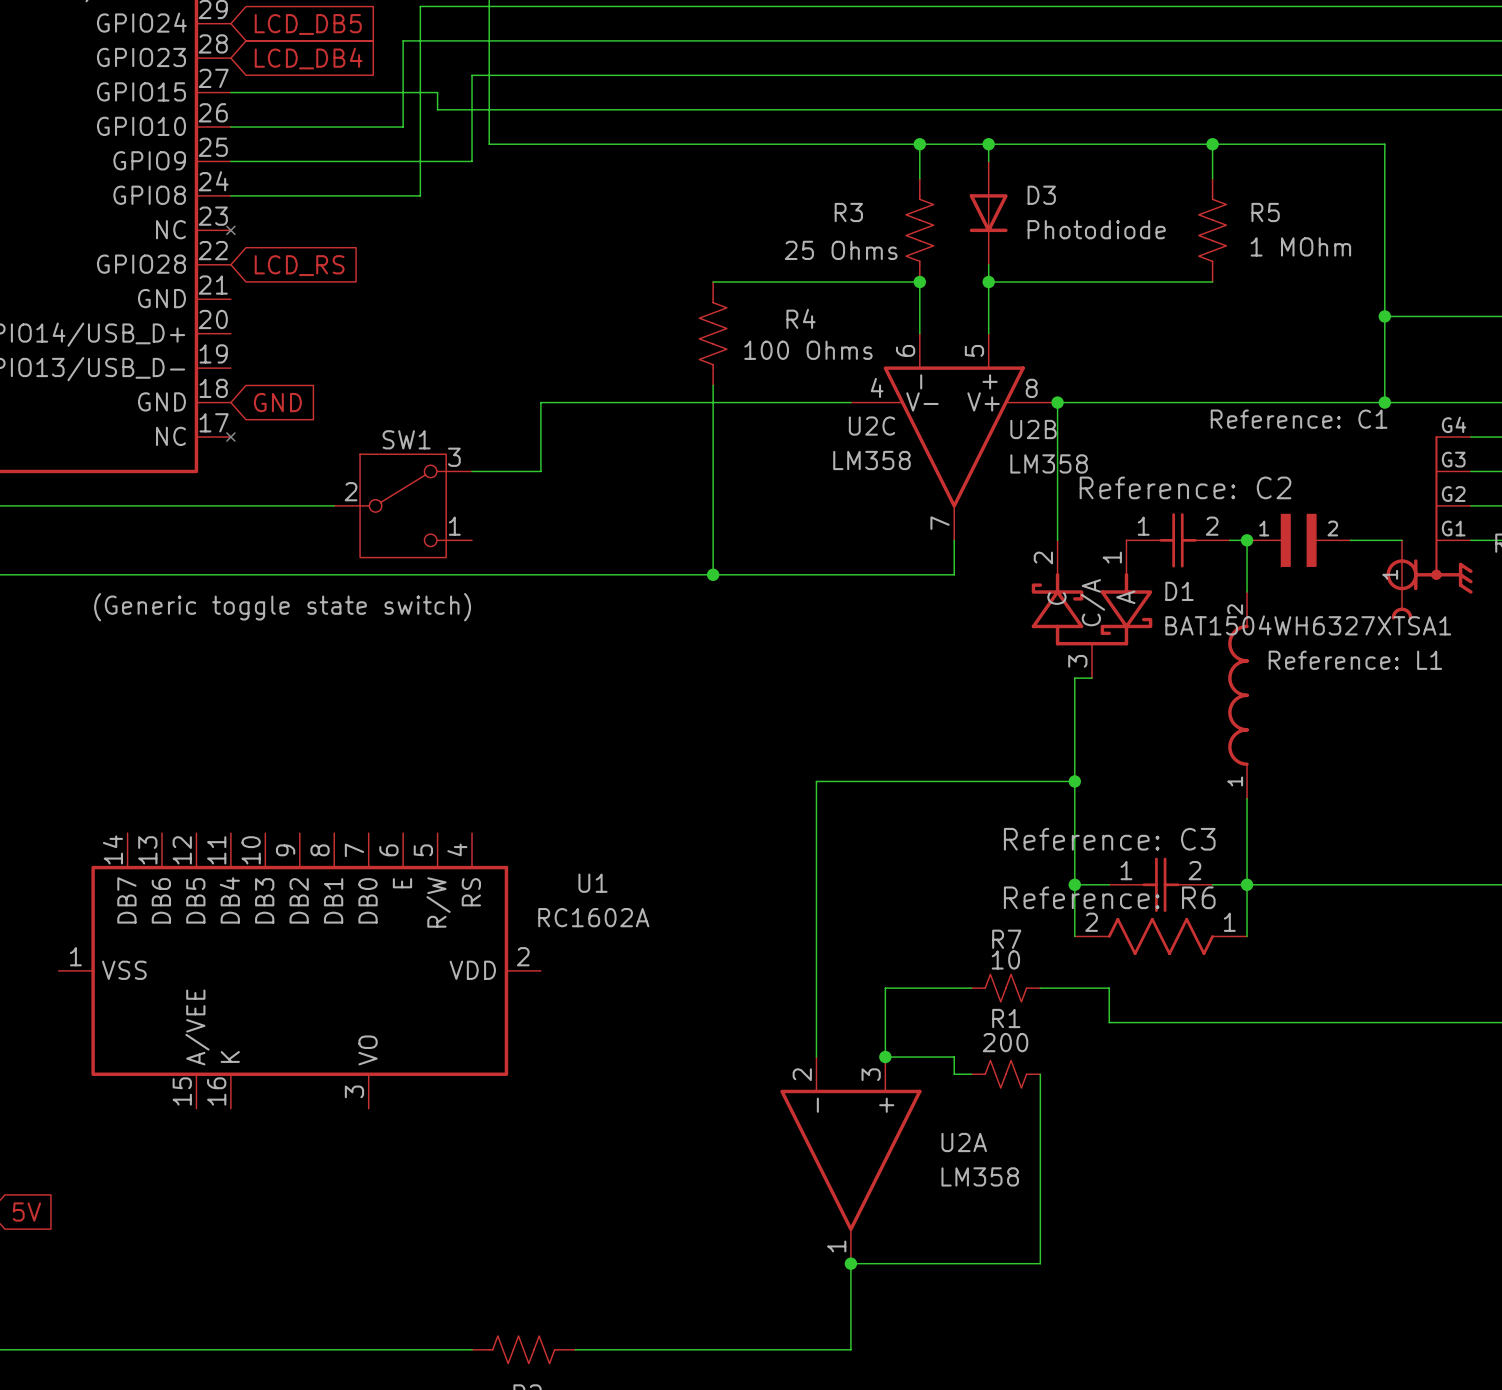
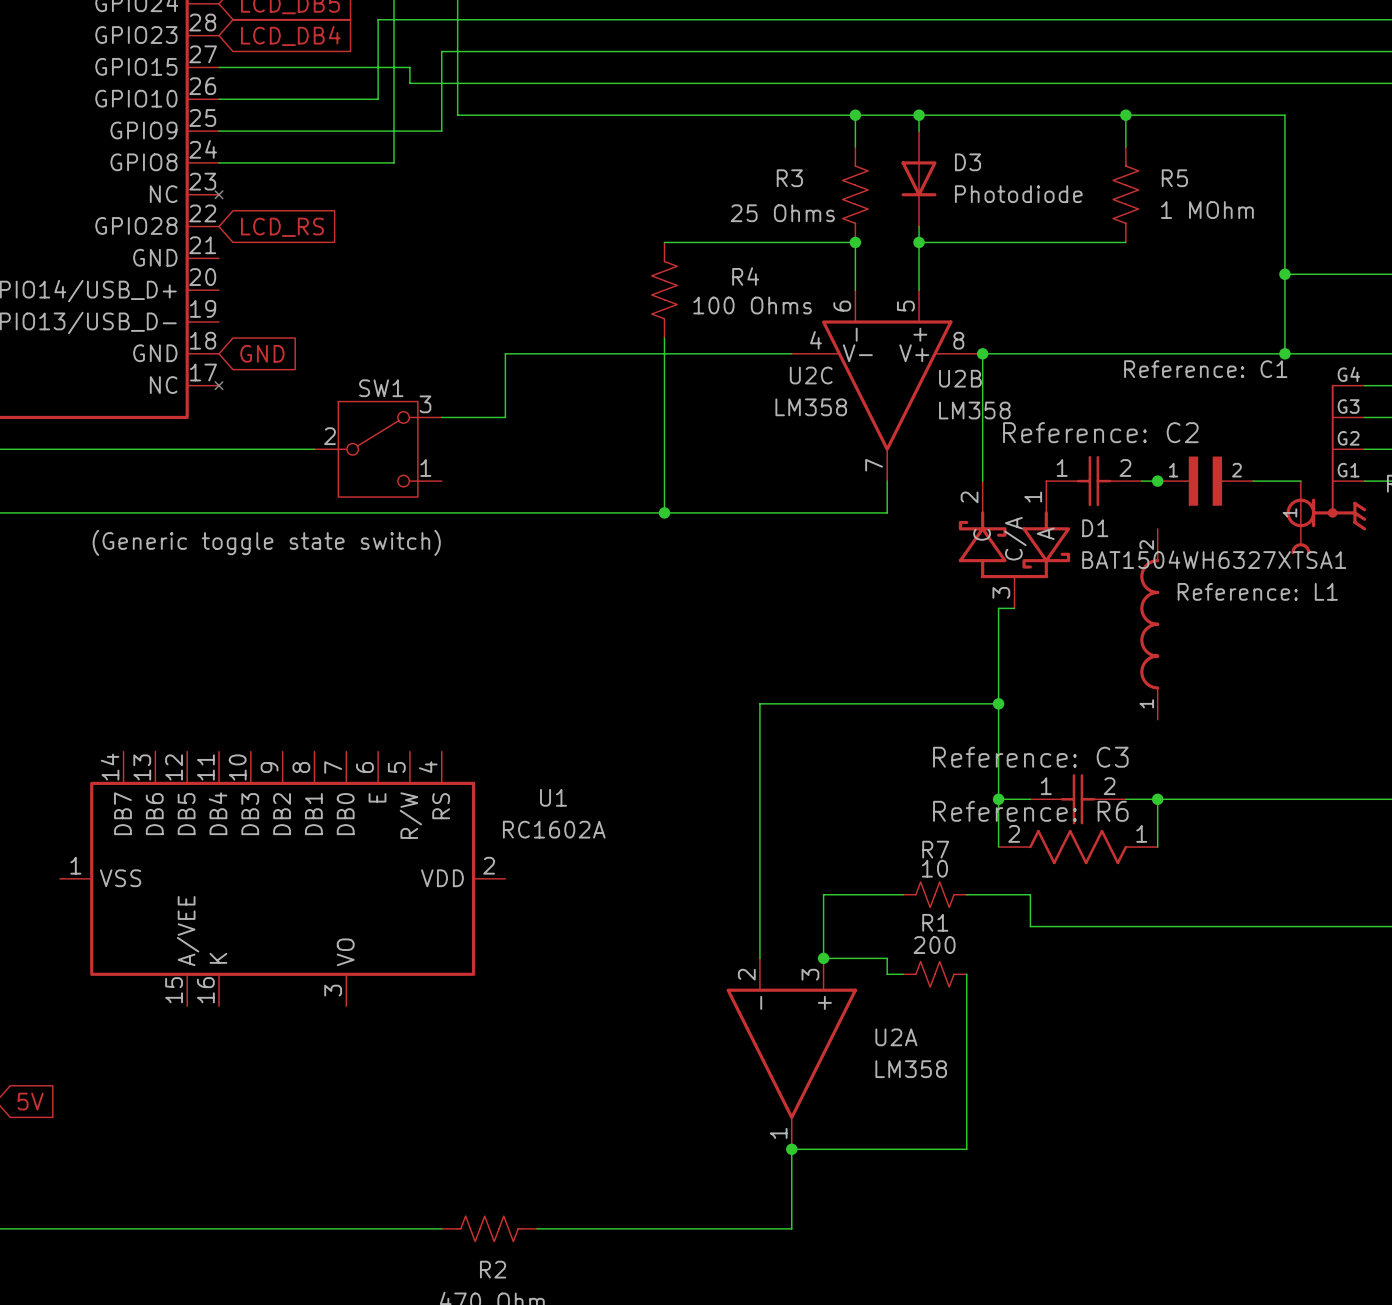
wire: (1247, 540) (1247, 592) -> none
wire: (1247, 798) (1247, 884) -> none

